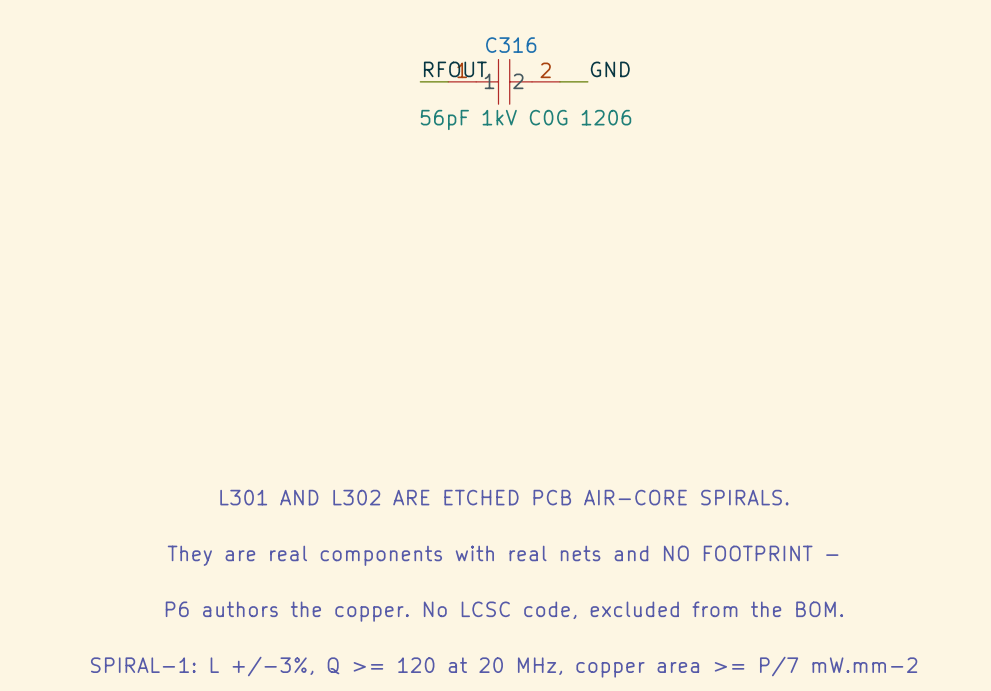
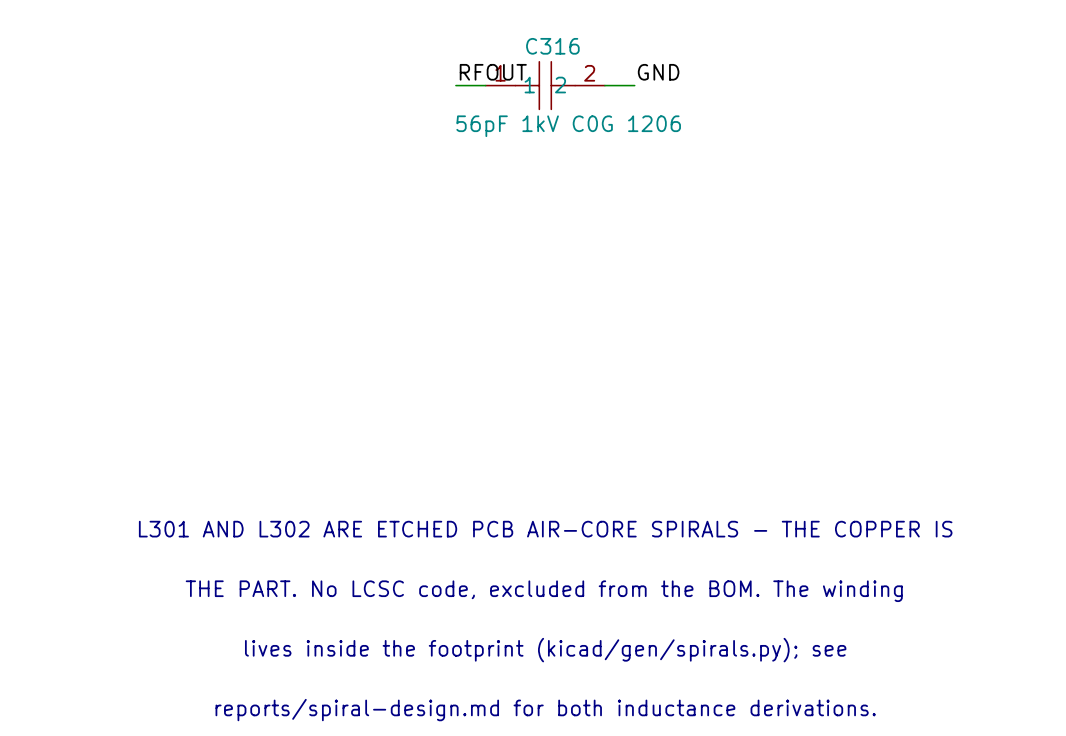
text: L301 AND L302 ARE ETCHED PCB AIR-CORE SPIRALS. (504, 497) -> L301 AND L302 ARE ETCHED PCB AIR-CORE SPIRALS - THE COPPER IS (545, 529)
text: They are real components with real nets and NO FOOTPRINT - (503, 555) -> THE PART. No LCSC code, excluded from the BOM. The winding (544, 591)
text: P6 authors the copper. No LCSC code, excluded from the BOM. (504, 611) -> lives inside the footprint (kicad/gen/spirals.py); see (545, 650)
text: SPIRAL-1: L +/-3%, Q >= 120 at 20 MHz, copper area >= P/7 mW.mm-2 (504, 667) -> reports/spiral-design.md for both inductance derivations. (545, 710)

